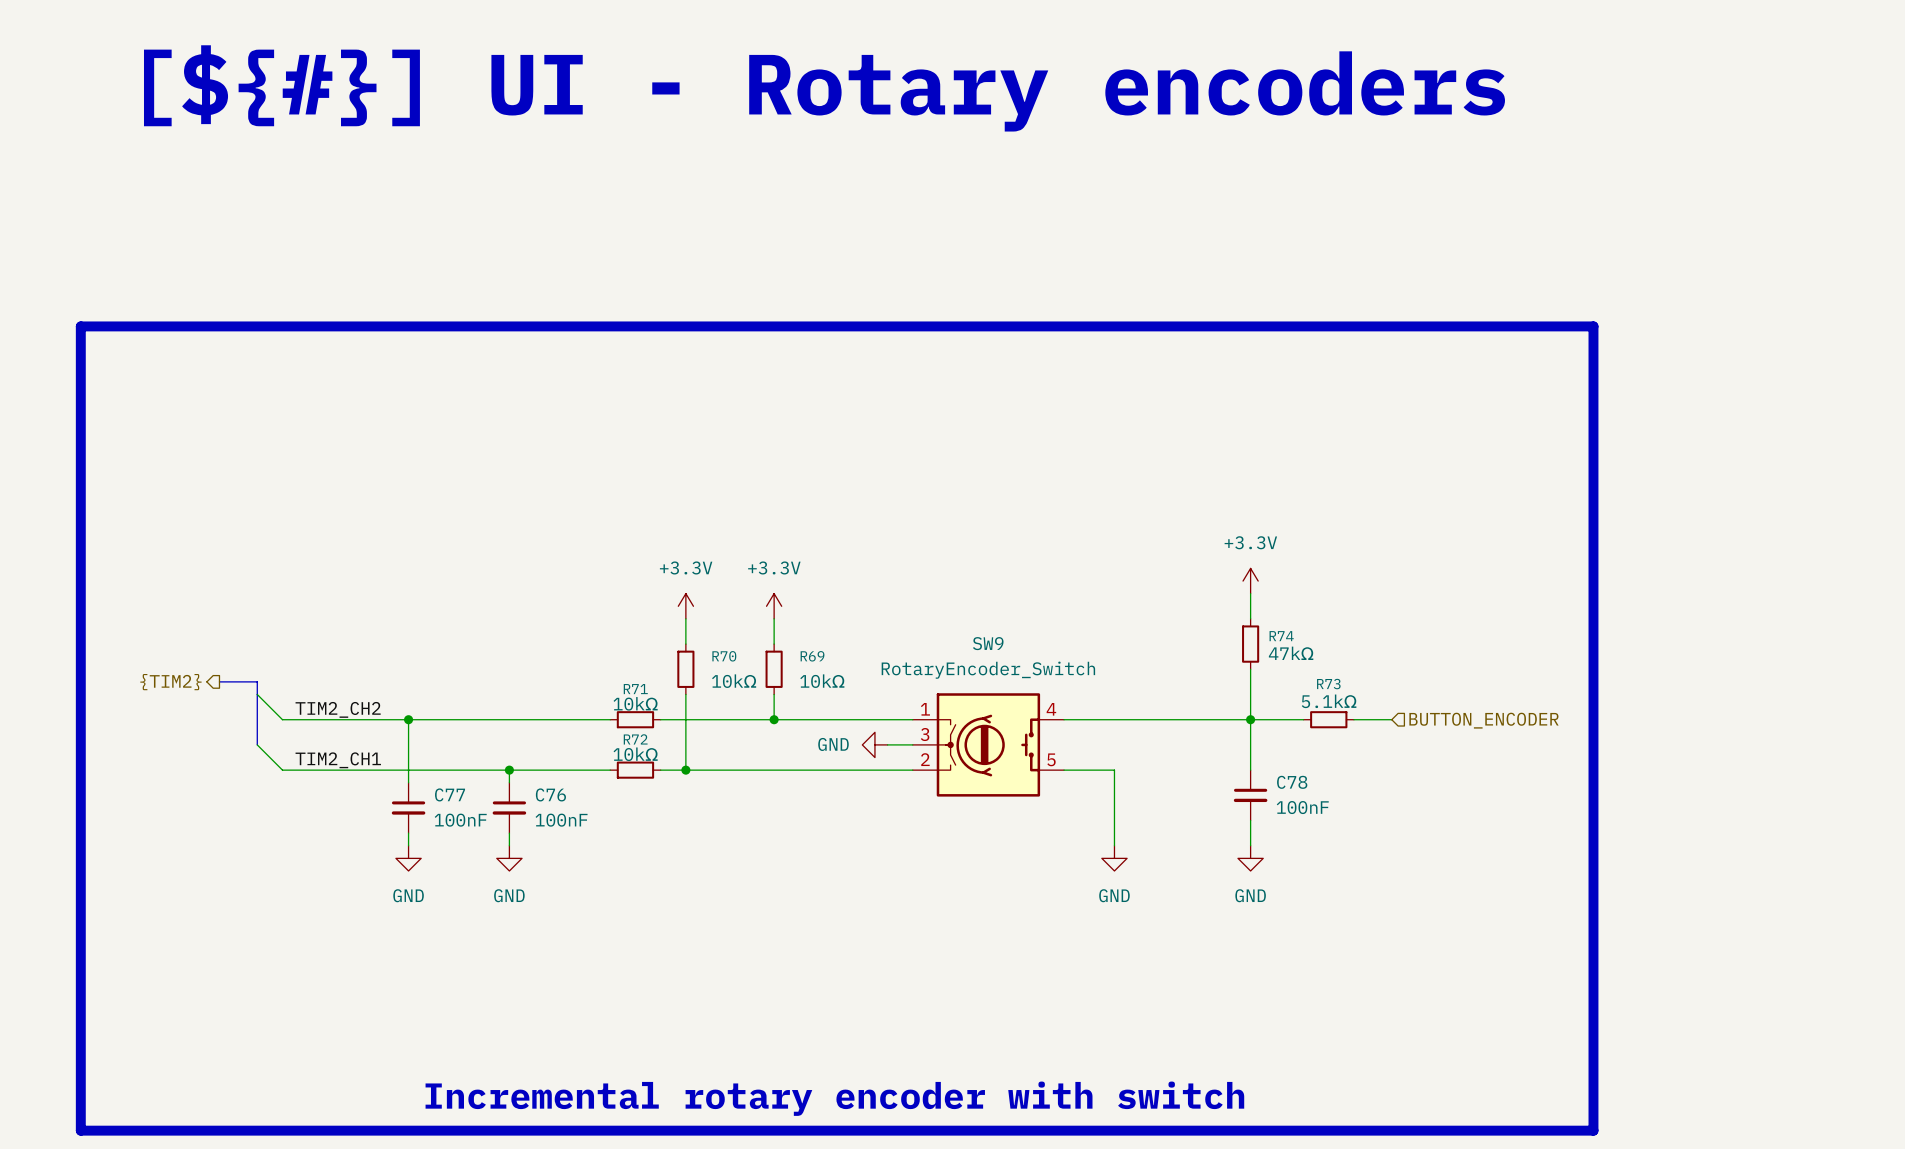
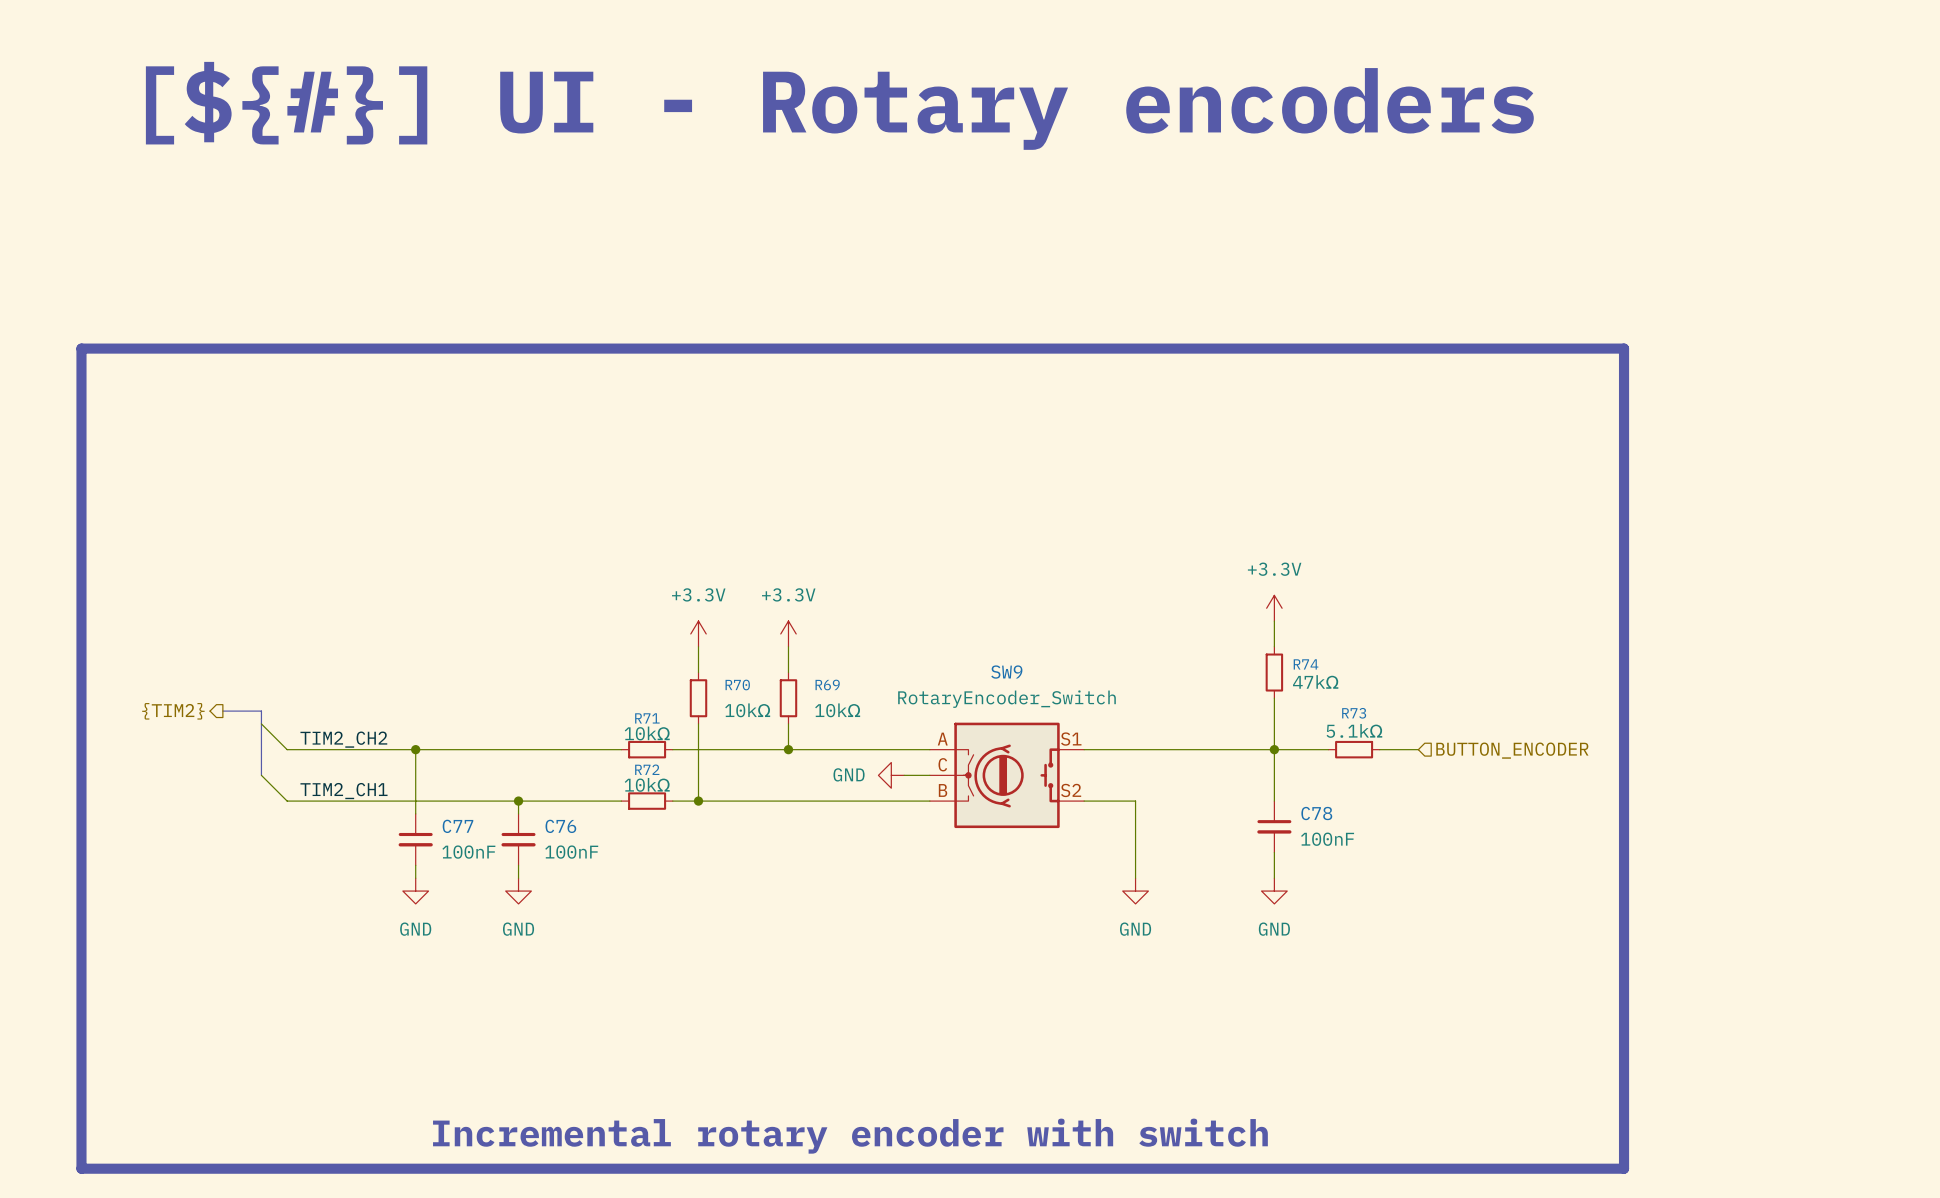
SW9 pin number: 1 (925, 709) -> A (942, 739)
SW9 pin number: 4 (1051, 709) -> S1 (1071, 739)
SW9 pin number: 3 (925, 734) -> C (942, 764)
SW9 pin number: 2 (925, 759) -> B (943, 790)
SW9 pin number: 5 (1051, 759) -> S2 (1071, 790)

